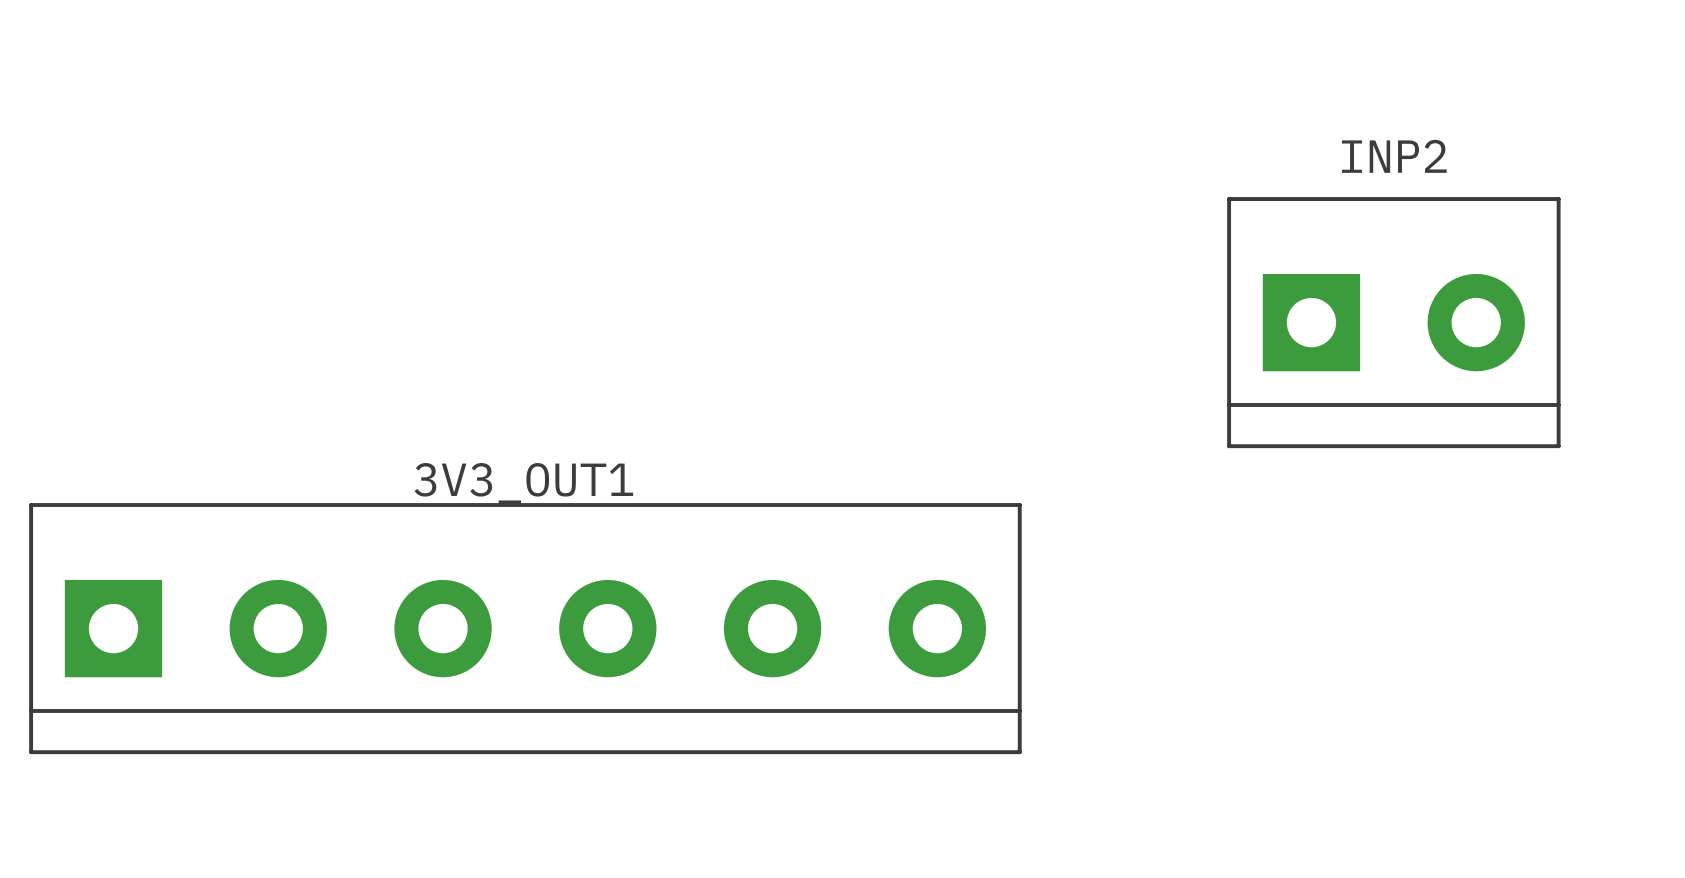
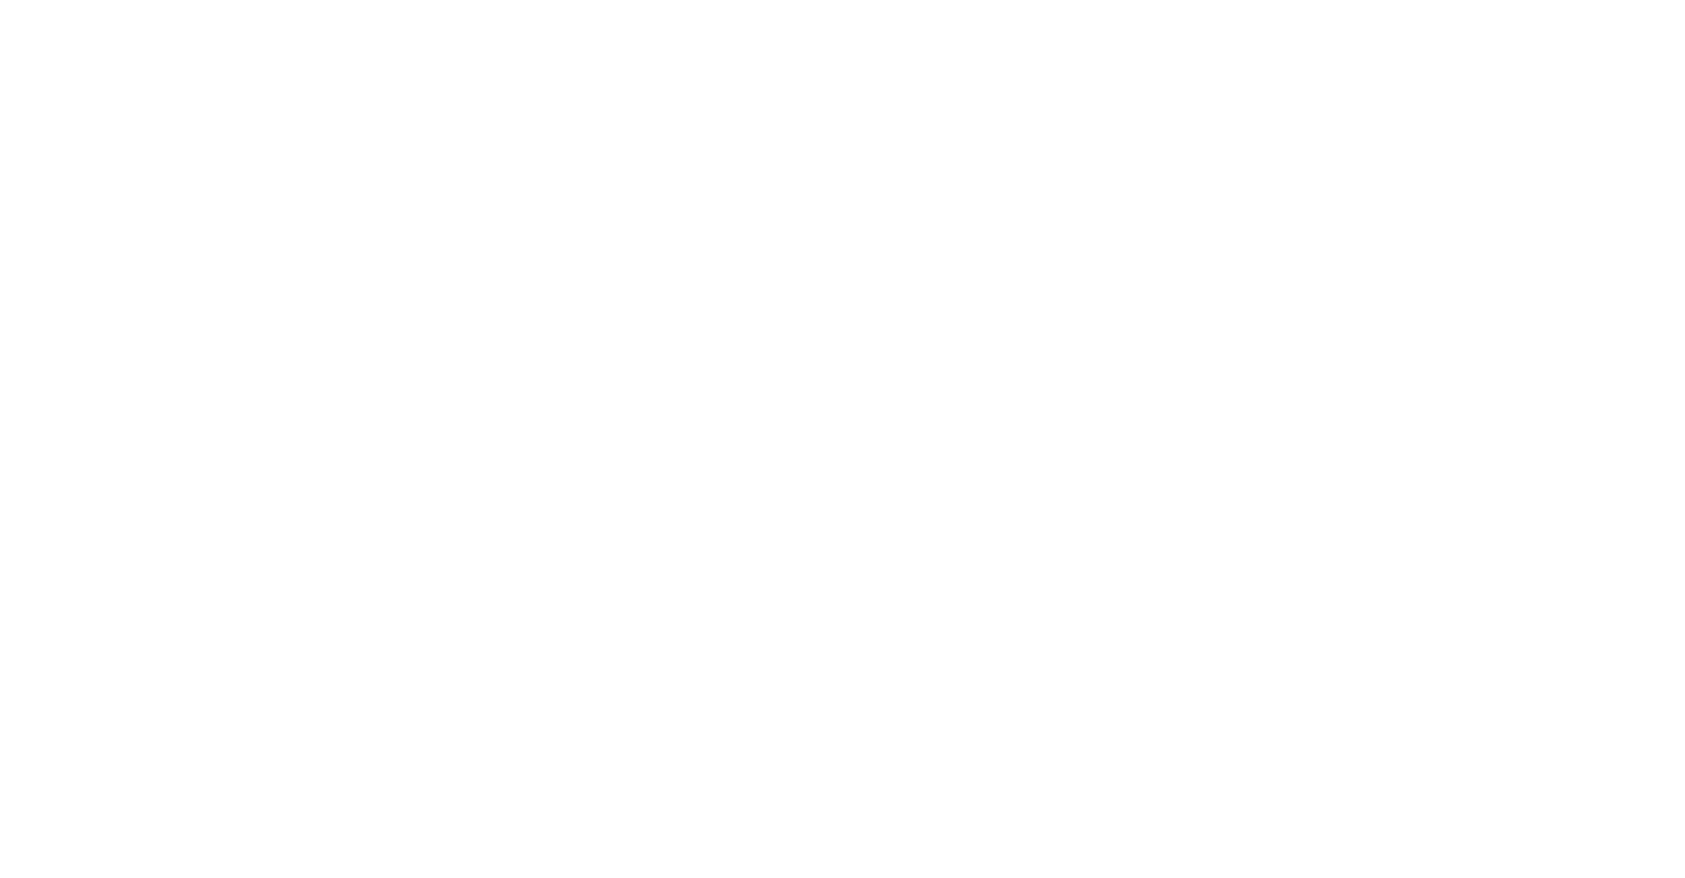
INP2: (1393, 322) -> none
3V3_OUT1: (525, 628) -> none

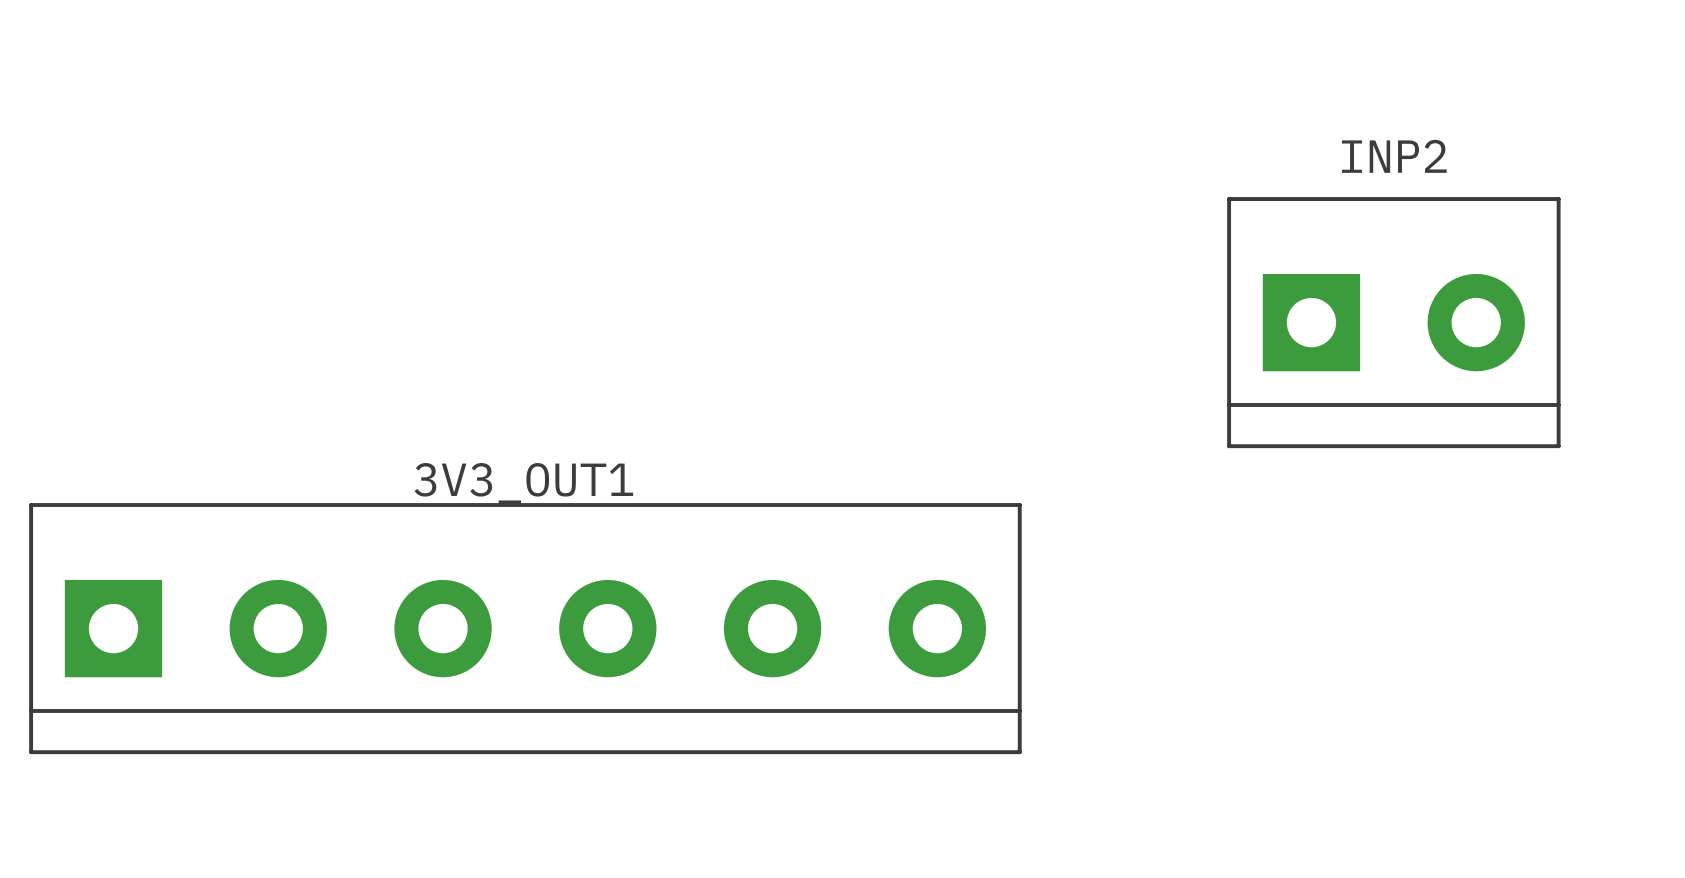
INP2: none -> (1393, 322)
3V3_OUT1: none -> (525, 628)

